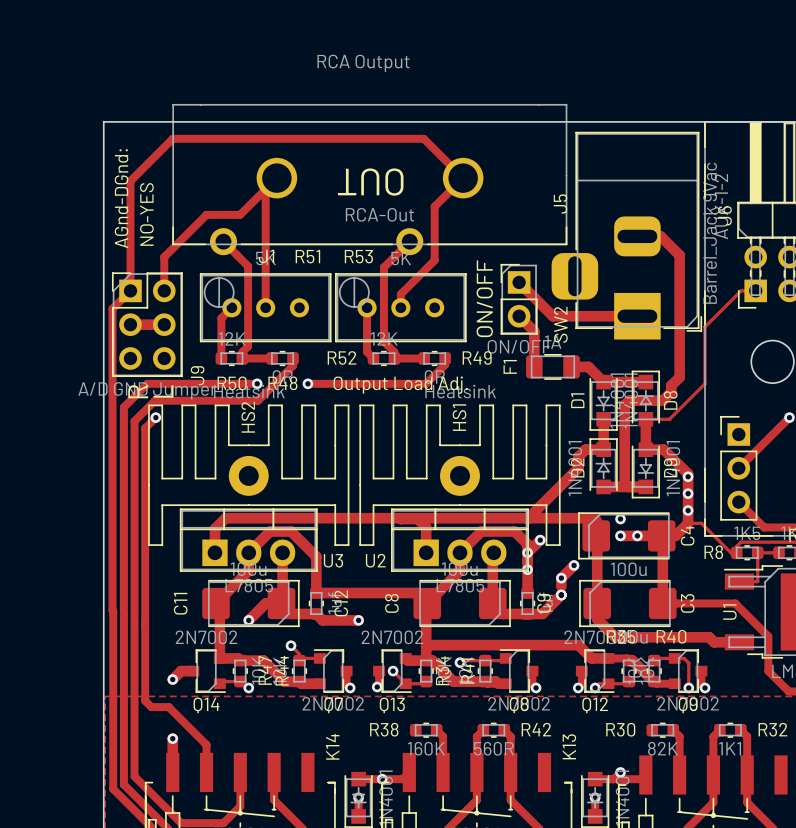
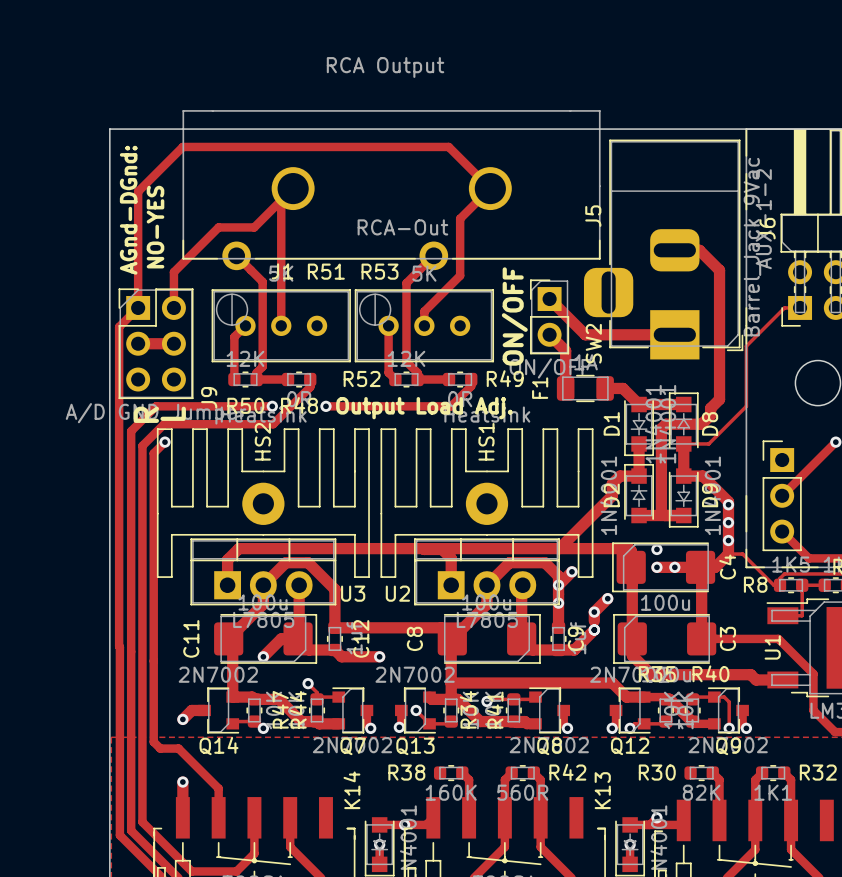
text: OUT (370, 182) -> none

